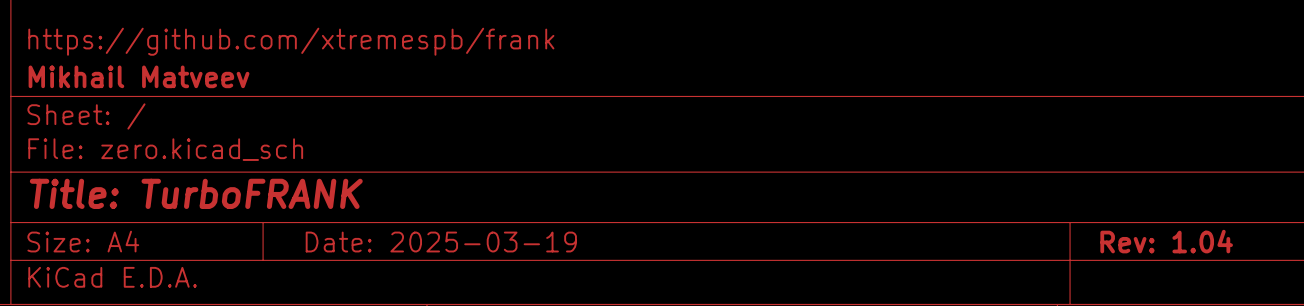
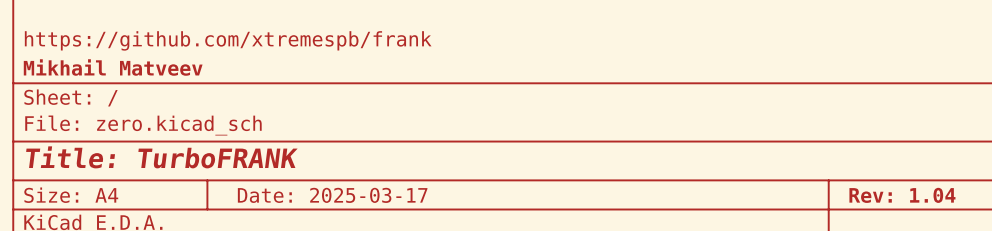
title block: Date: 2025-03-19 (441, 242) -> Date: 2025-03-17 (332, 195)

